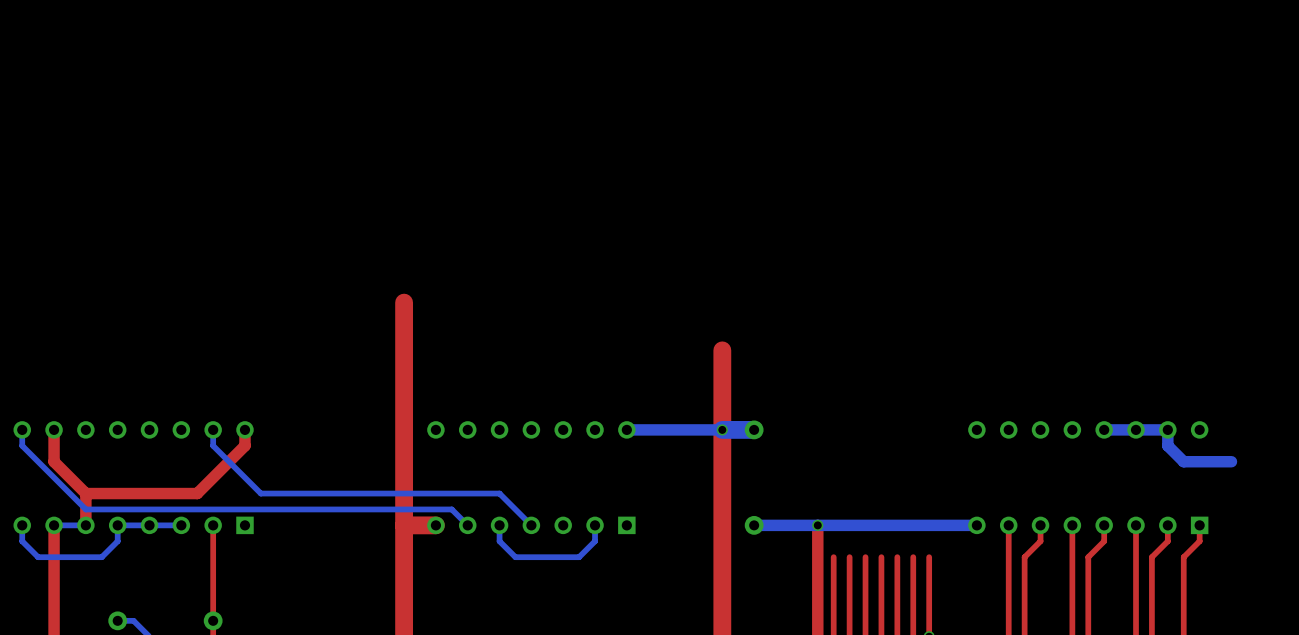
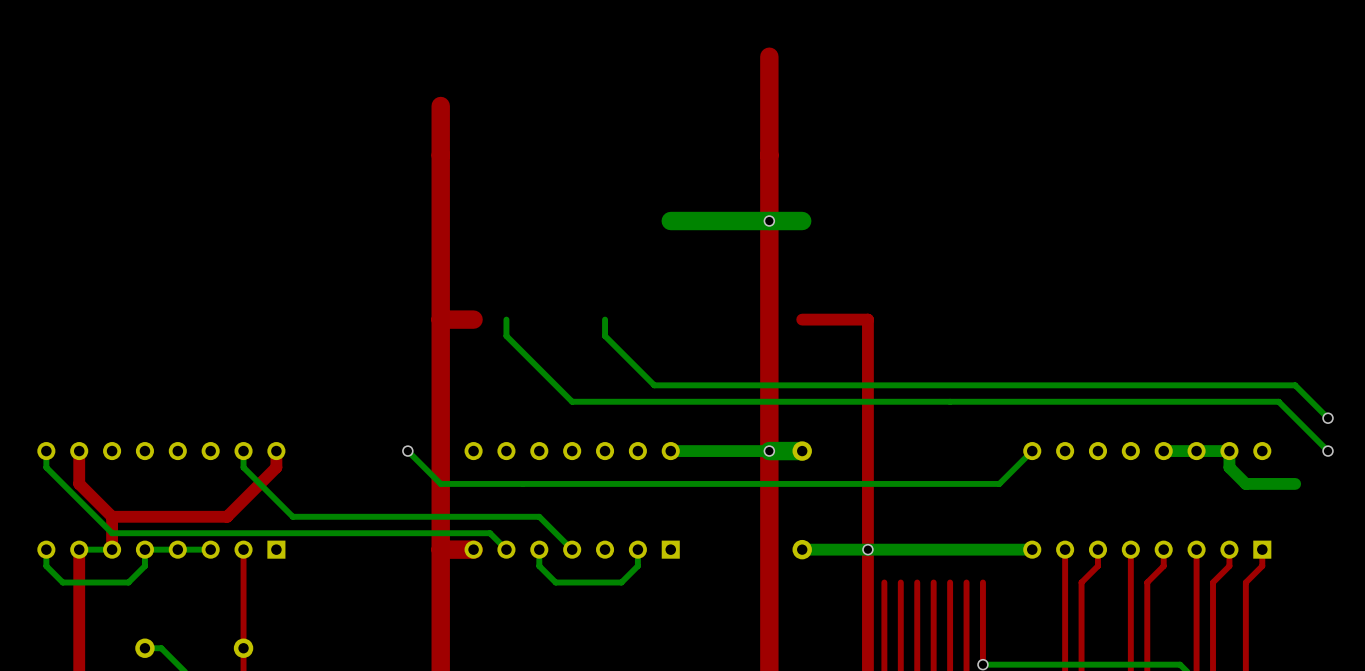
top track: none -> (769, 56) (769, 368)
top track: none -> (440, 106) (440, 319) (473, 319)
via: none -> (769, 221)
bottom track: none -> (802, 221) (670, 221)
bottom track: none -> (506, 319) (506, 336) (572, 401) (1278, 401) (1328, 451)
bottom track: none -> (605, 319) (605, 336) (654, 385) (1295, 385) (1328, 418)
top track: none -> (802, 319) (867, 319) (867, 549)
via: none -> (1328, 418)
via: none -> (407, 451)
bottom track: none -> (1032, 451) (999, 483) (440, 483) (407, 451)
via: none -> (1328, 451)

